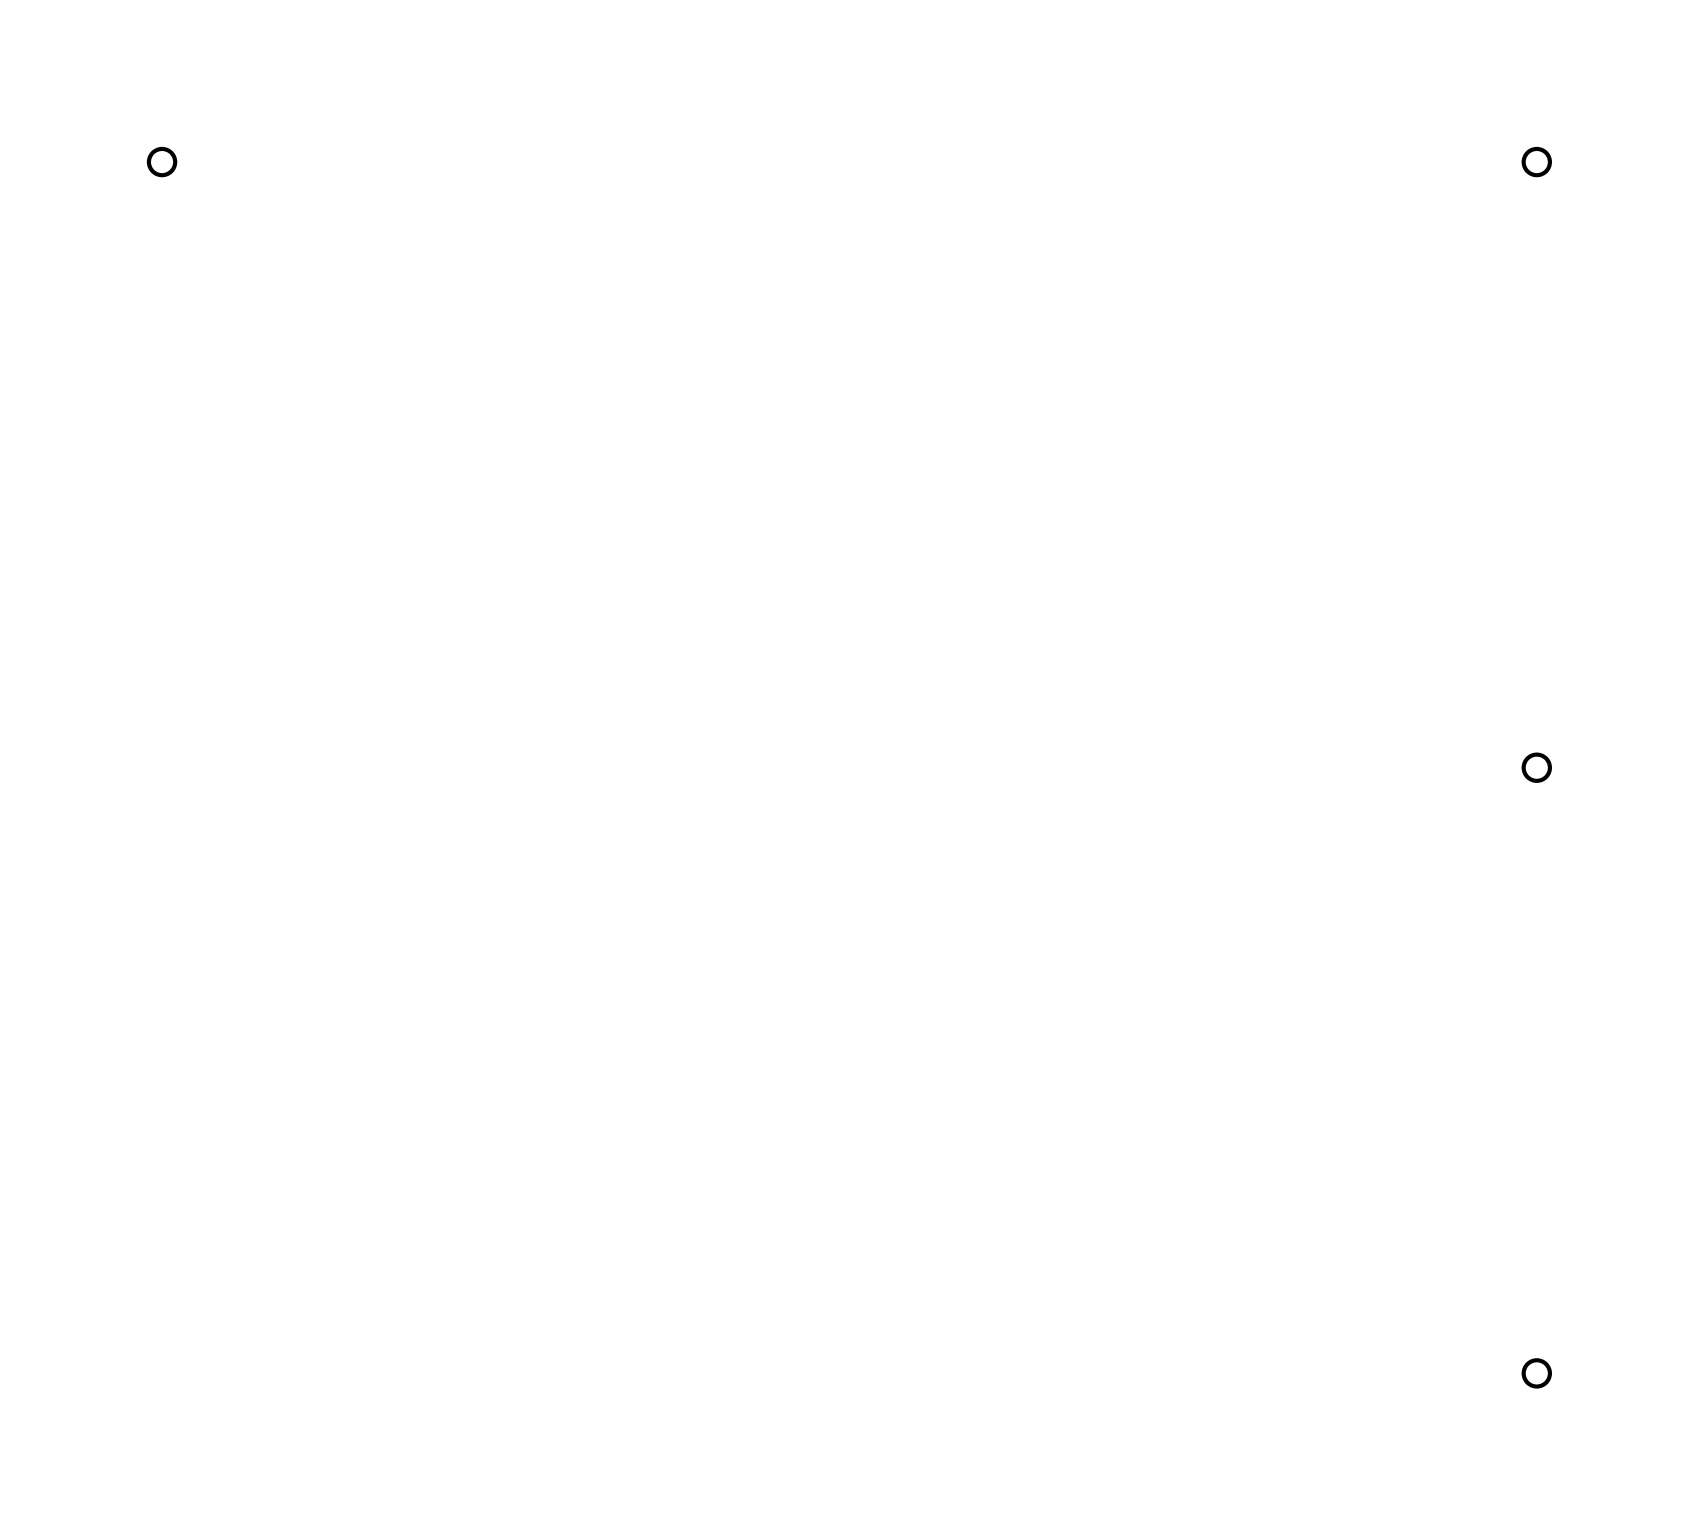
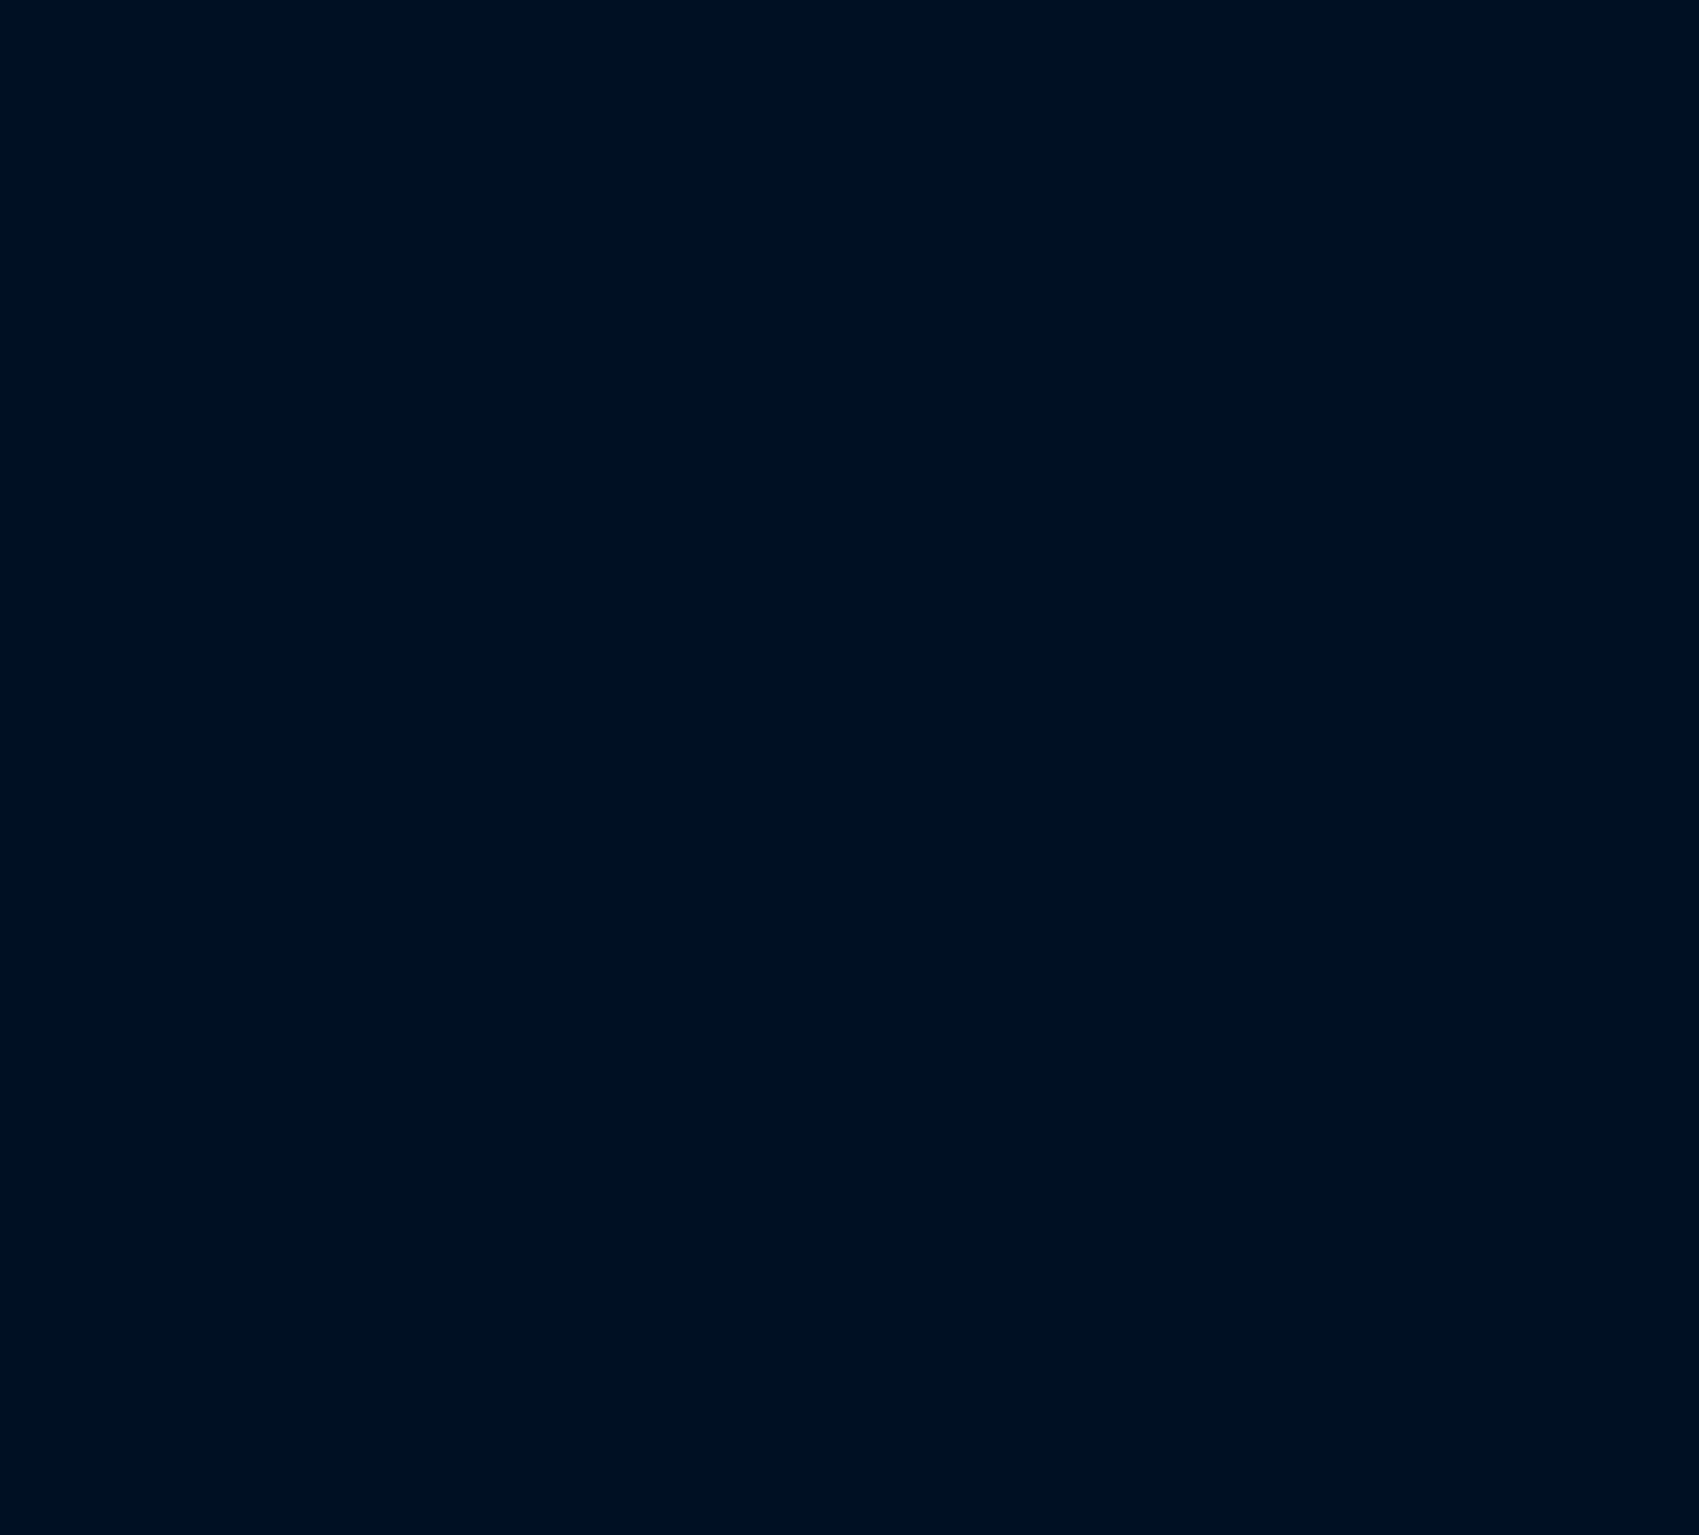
part: (162, 162) -> none
part: (1536, 162) -> none
part: (1536, 767) -> none
part: (1536, 1373) -> none

